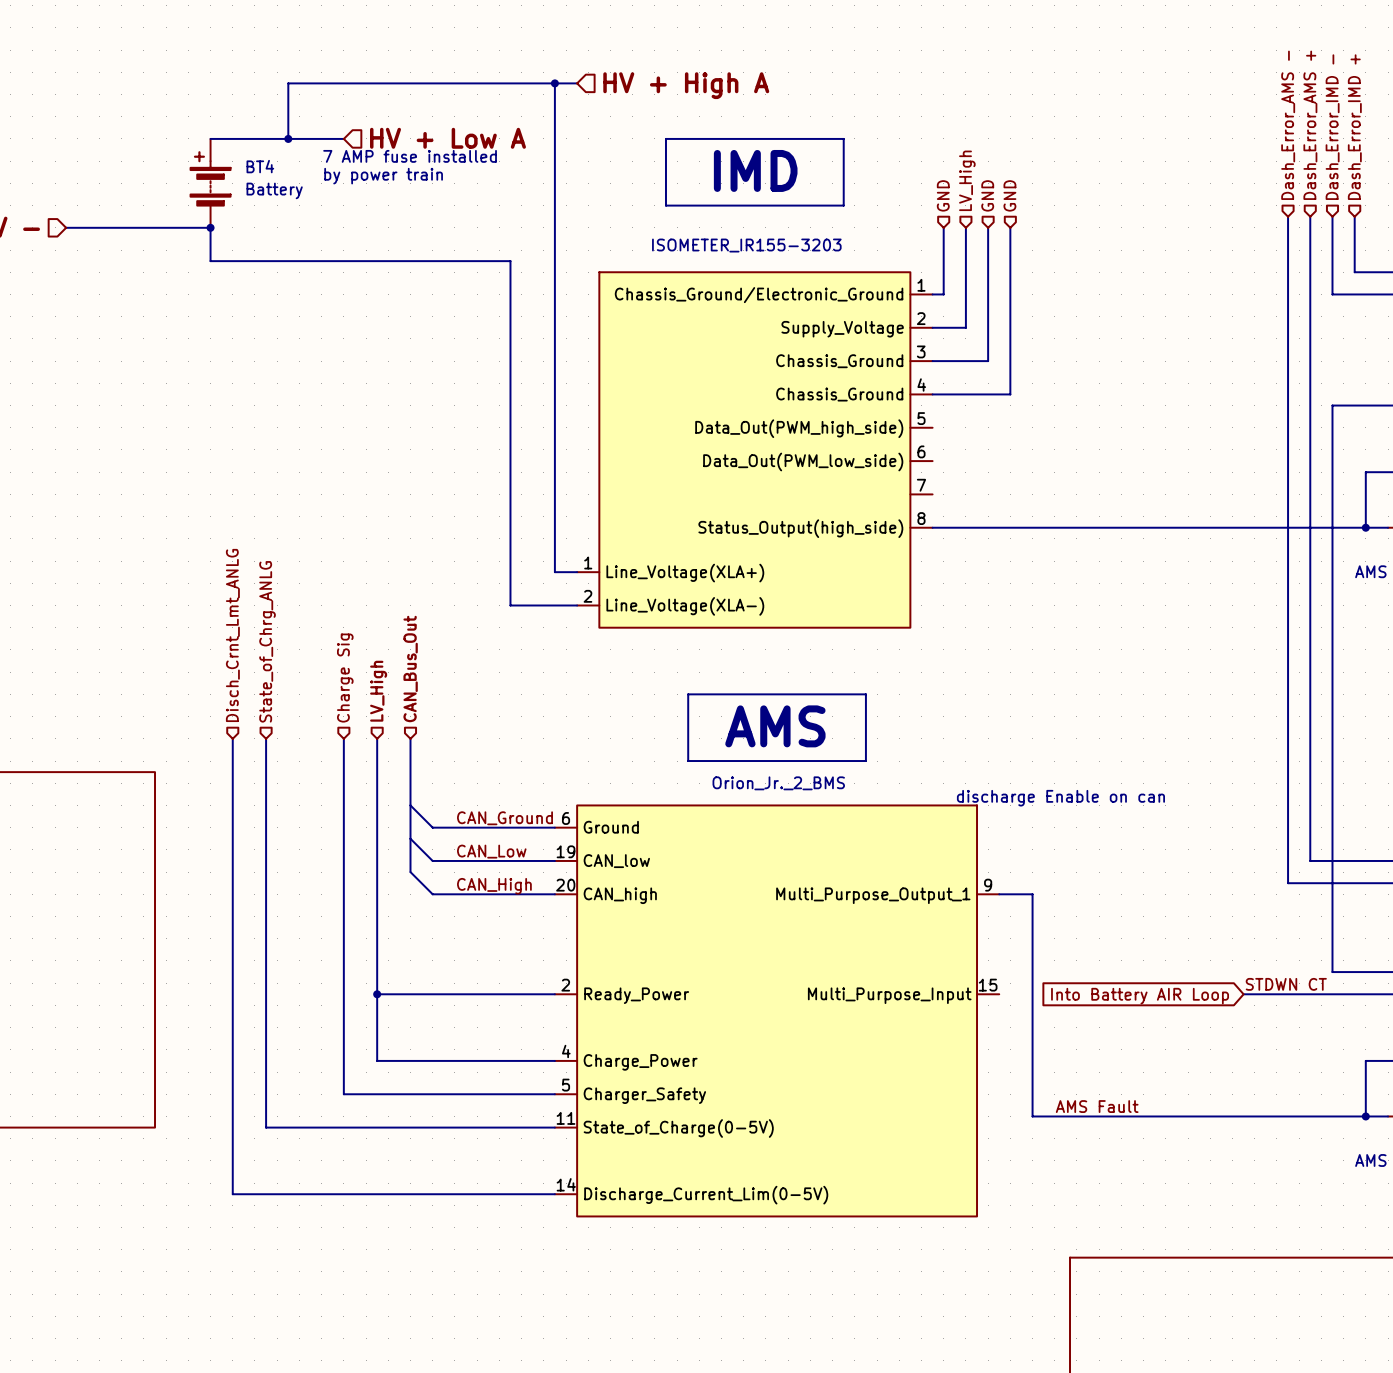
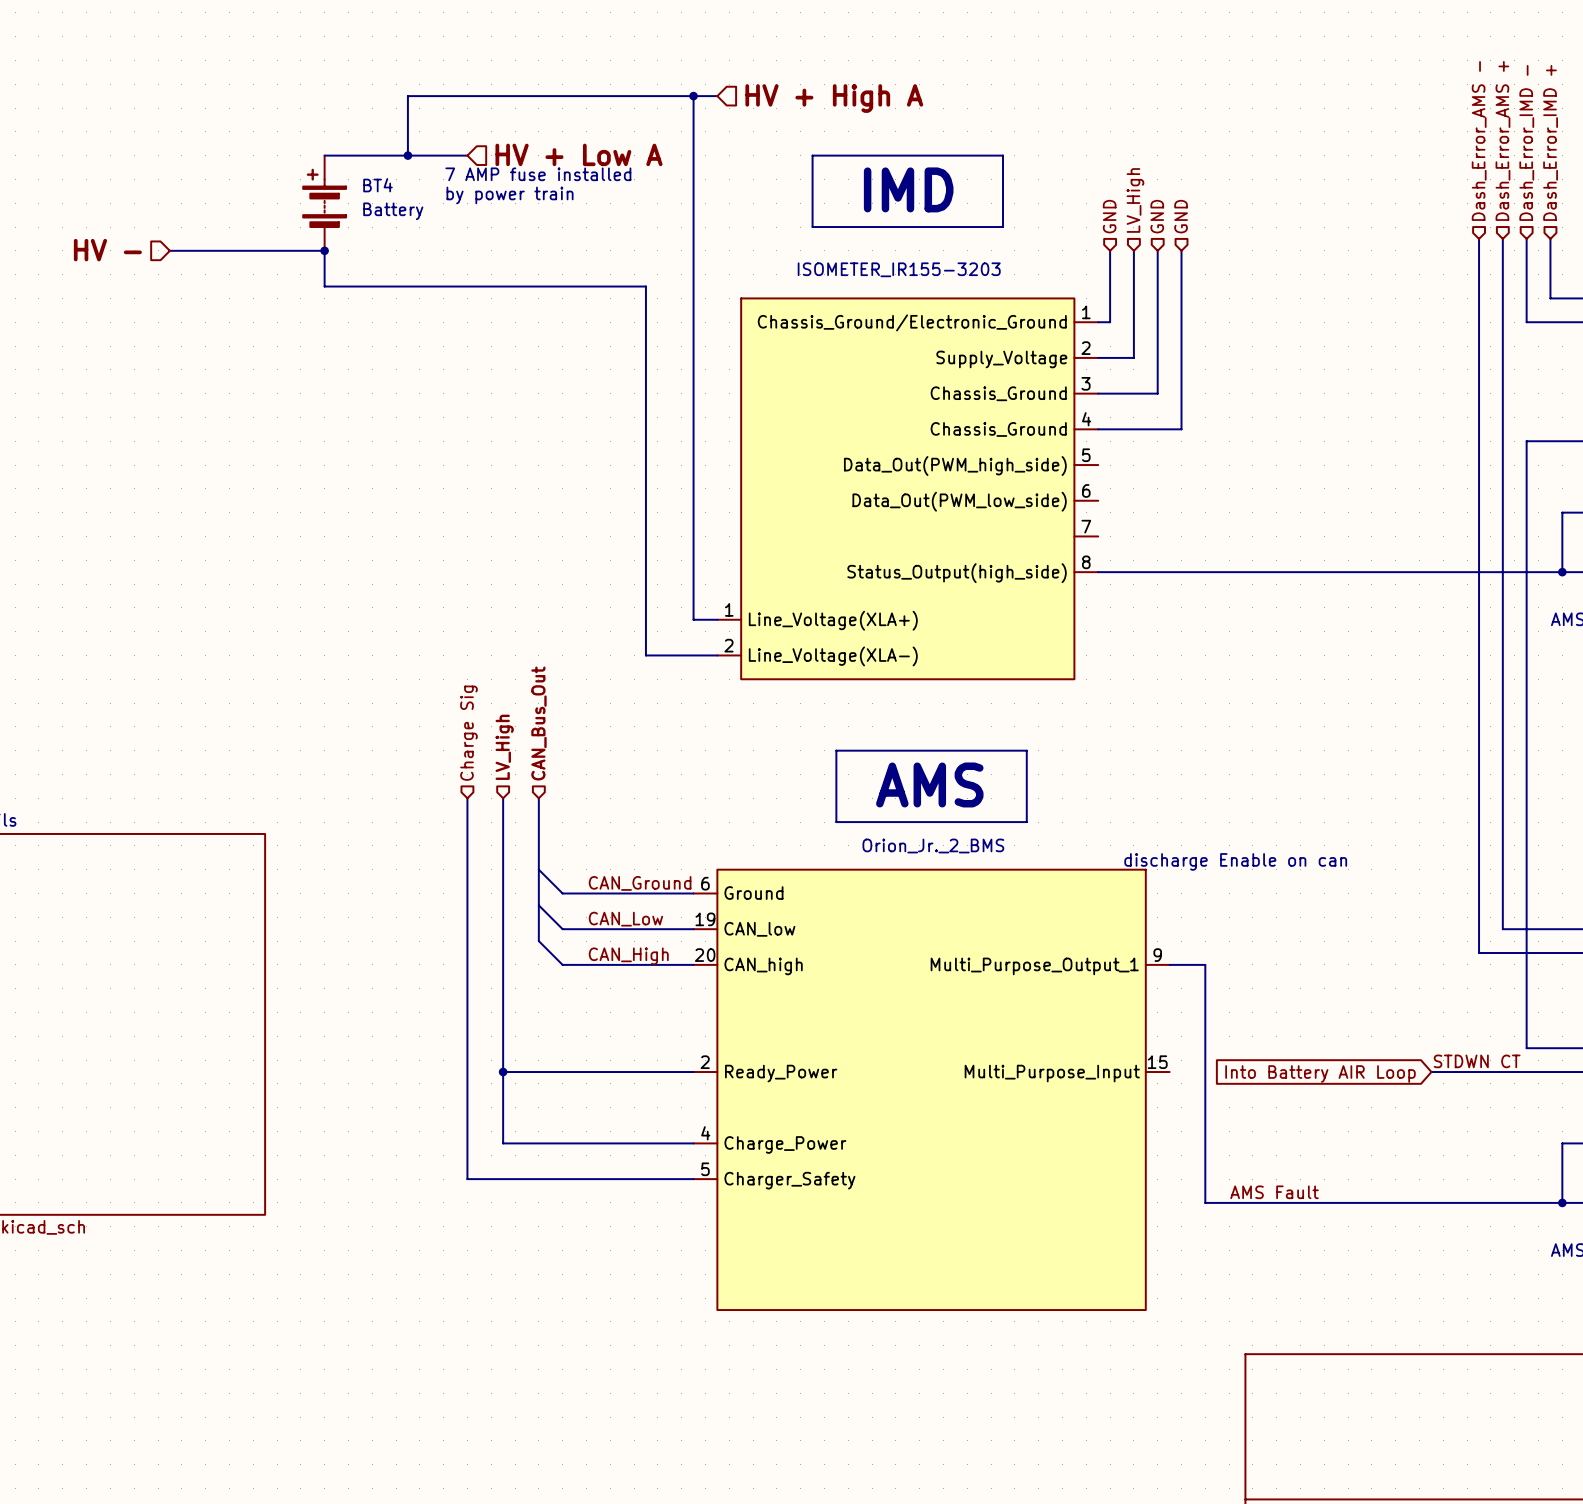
hierarchical label: Disch_Crnt_Lmt_ANLG (232, 635) -> none
hierarchical label: State_of_Chrg_ANLG (267, 641) -> none
wire: (232, 738) (232, 1194) (554, 1194) -> none
wire: (266, 738) (266, 1127) (554, 1127) -> none
part symbol: [554, 805, 1000, 1217] -> [693, 869, 1170, 1311]

